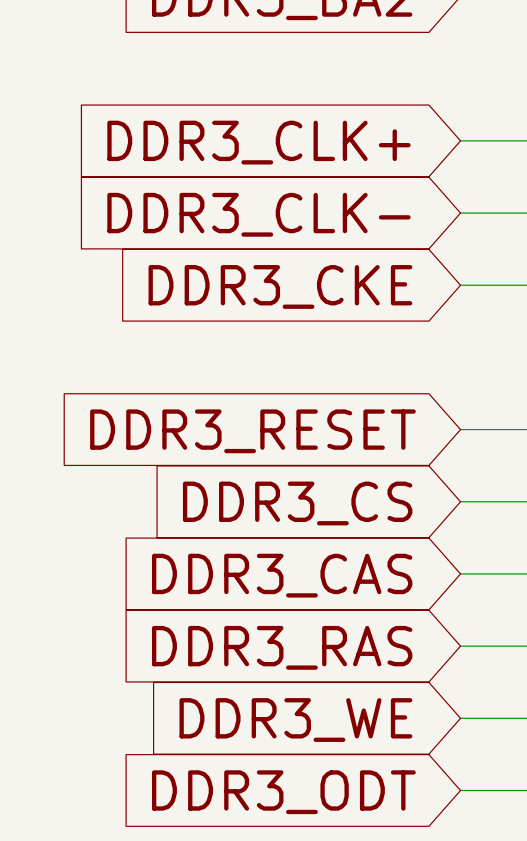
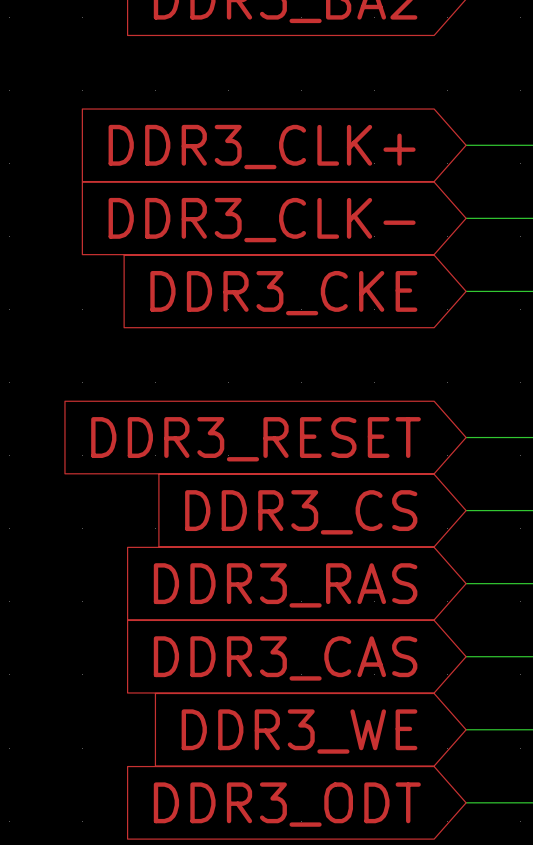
global label: DDR3_CAS (282, 575) -> DDR3_RAS (285, 585)
global label: DDR3_RAS (282, 647) -> DDR3_CAS (285, 658)

